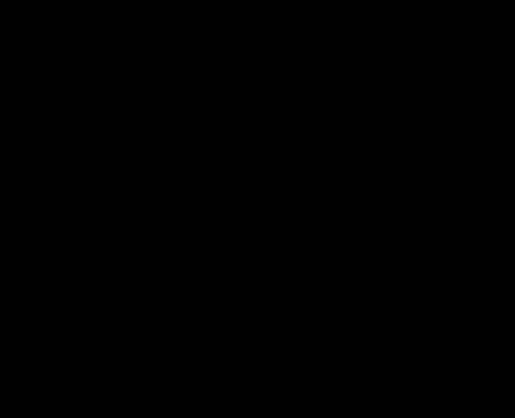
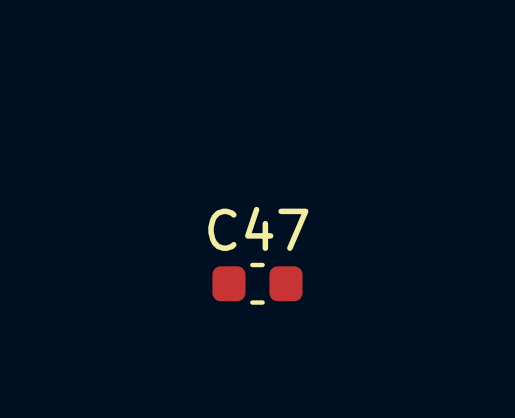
C47: none -> (257, 283)

